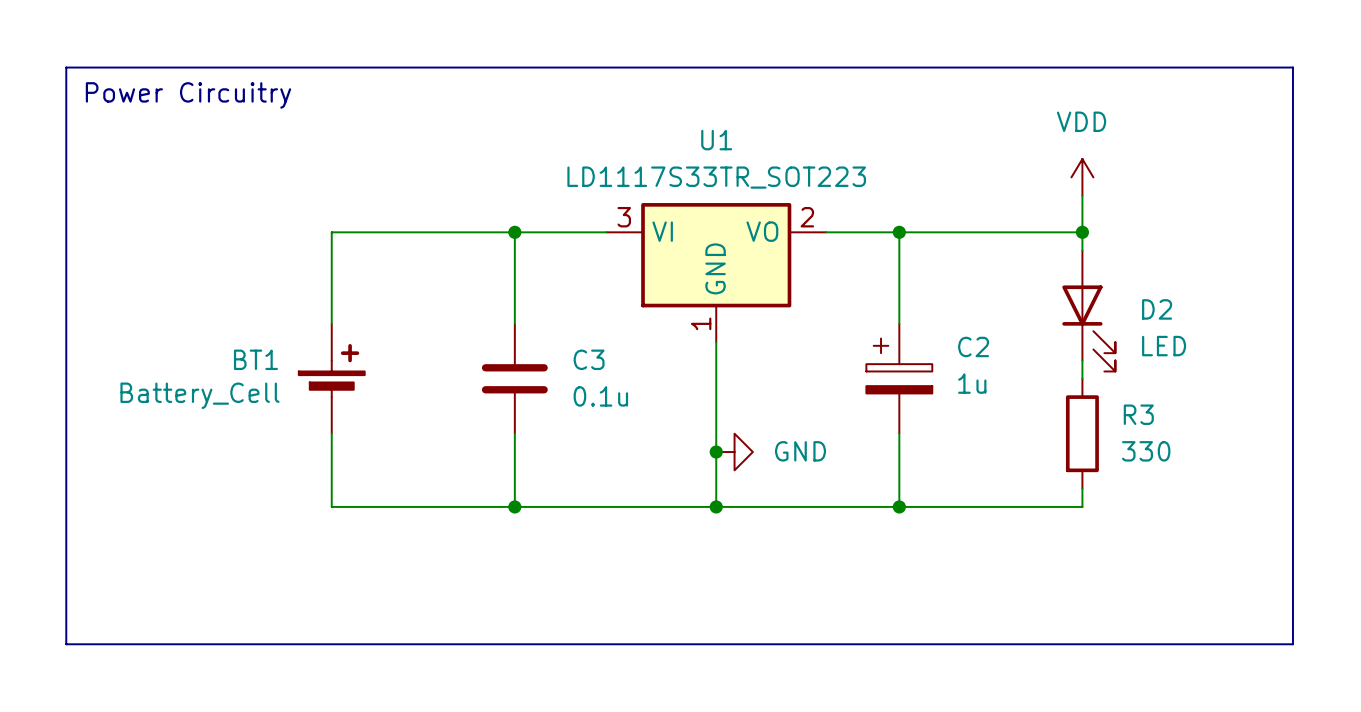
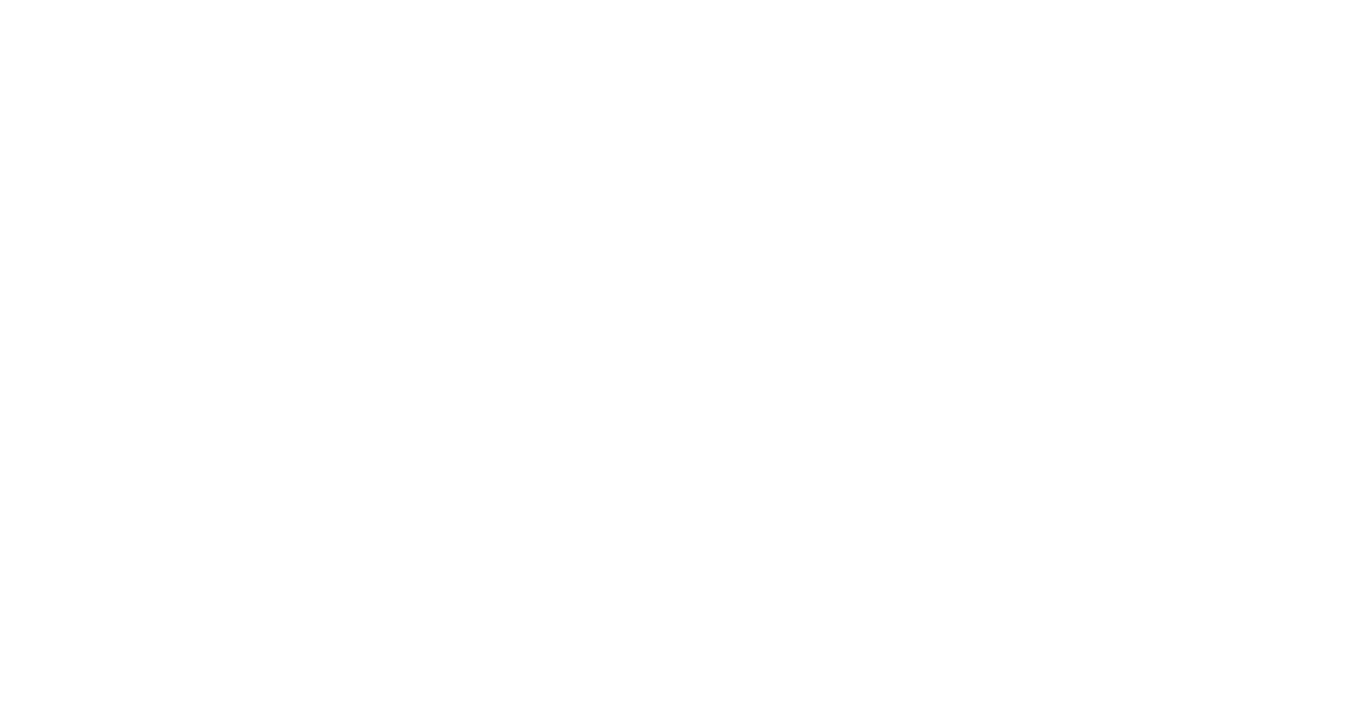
line: (66, 67) (1292, 67) (1292, 644) (66, 644) (66, 67) -> none
text: Power Circuitry (188, 95) -> none
power symbol: VDD (1082, 177) -> none
wire: (1082, 195) (1082, 250) -> none
wire: (514, 232) (514, 323) -> none
junction: (514, 232) -> none
wire: (606, 232) (331, 232) (331, 323) -> none
wire: (826, 232) (1082, 232) -> none
wire: (899, 232) (899, 323) -> none
junction: (899, 232) -> none
junction: (1082, 232) -> none
U1: LD1117S33TR_SOT223 (716, 272) -> none
D2: LED (1088, 311) -> none
wire: (716, 342) (716, 506) -> none
wire: (1082, 360) (1082, 378) -> none
BT1: Battery_Cell (331, 378) -> none
C3: 0.1u (514, 378) -> none
C2: 1u (899, 378) -> none
wire: (331, 433) (331, 506) (1082, 506) (1082, 488) -> none
wire: (514, 433) (514, 506) -> none
wire: (899, 433) (899, 506) -> none
R3: 330 (1082, 433) -> none
junction: (716, 452) -> none
power symbol: GND (734, 452) -> none
junction: (514, 506) -> none
junction: (716, 506) -> none
junction: (899, 506) -> none

